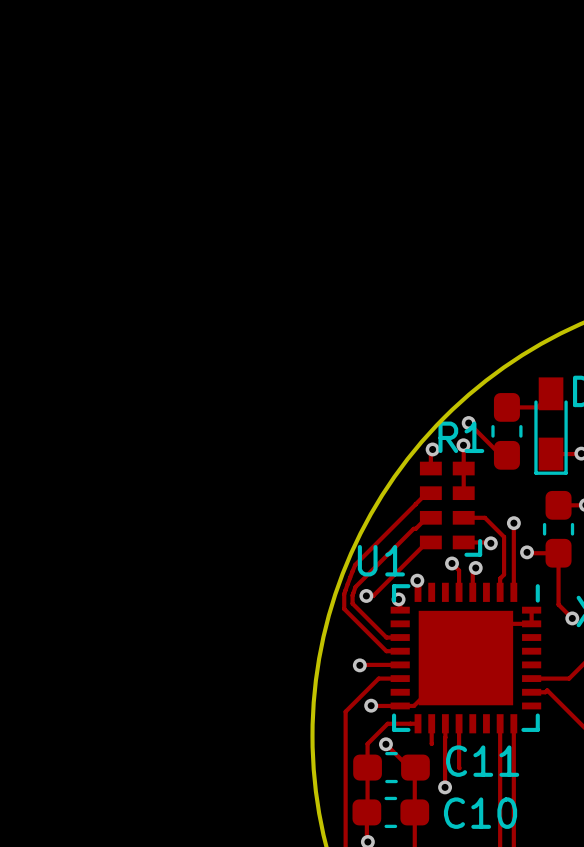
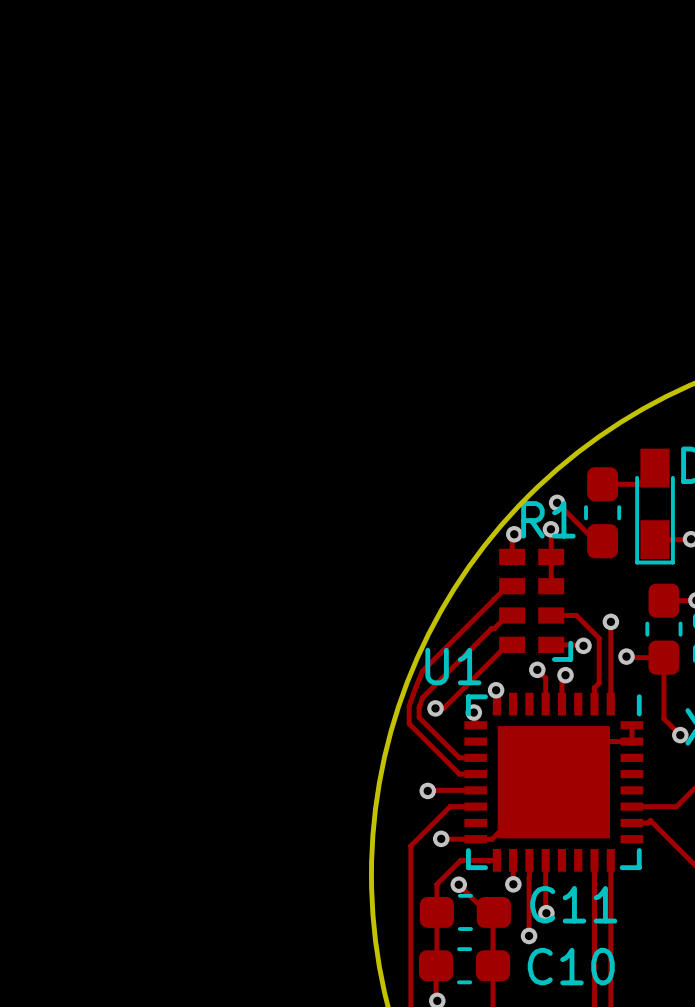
via: none -> (513, 884)
via: none -> (546, 913)

